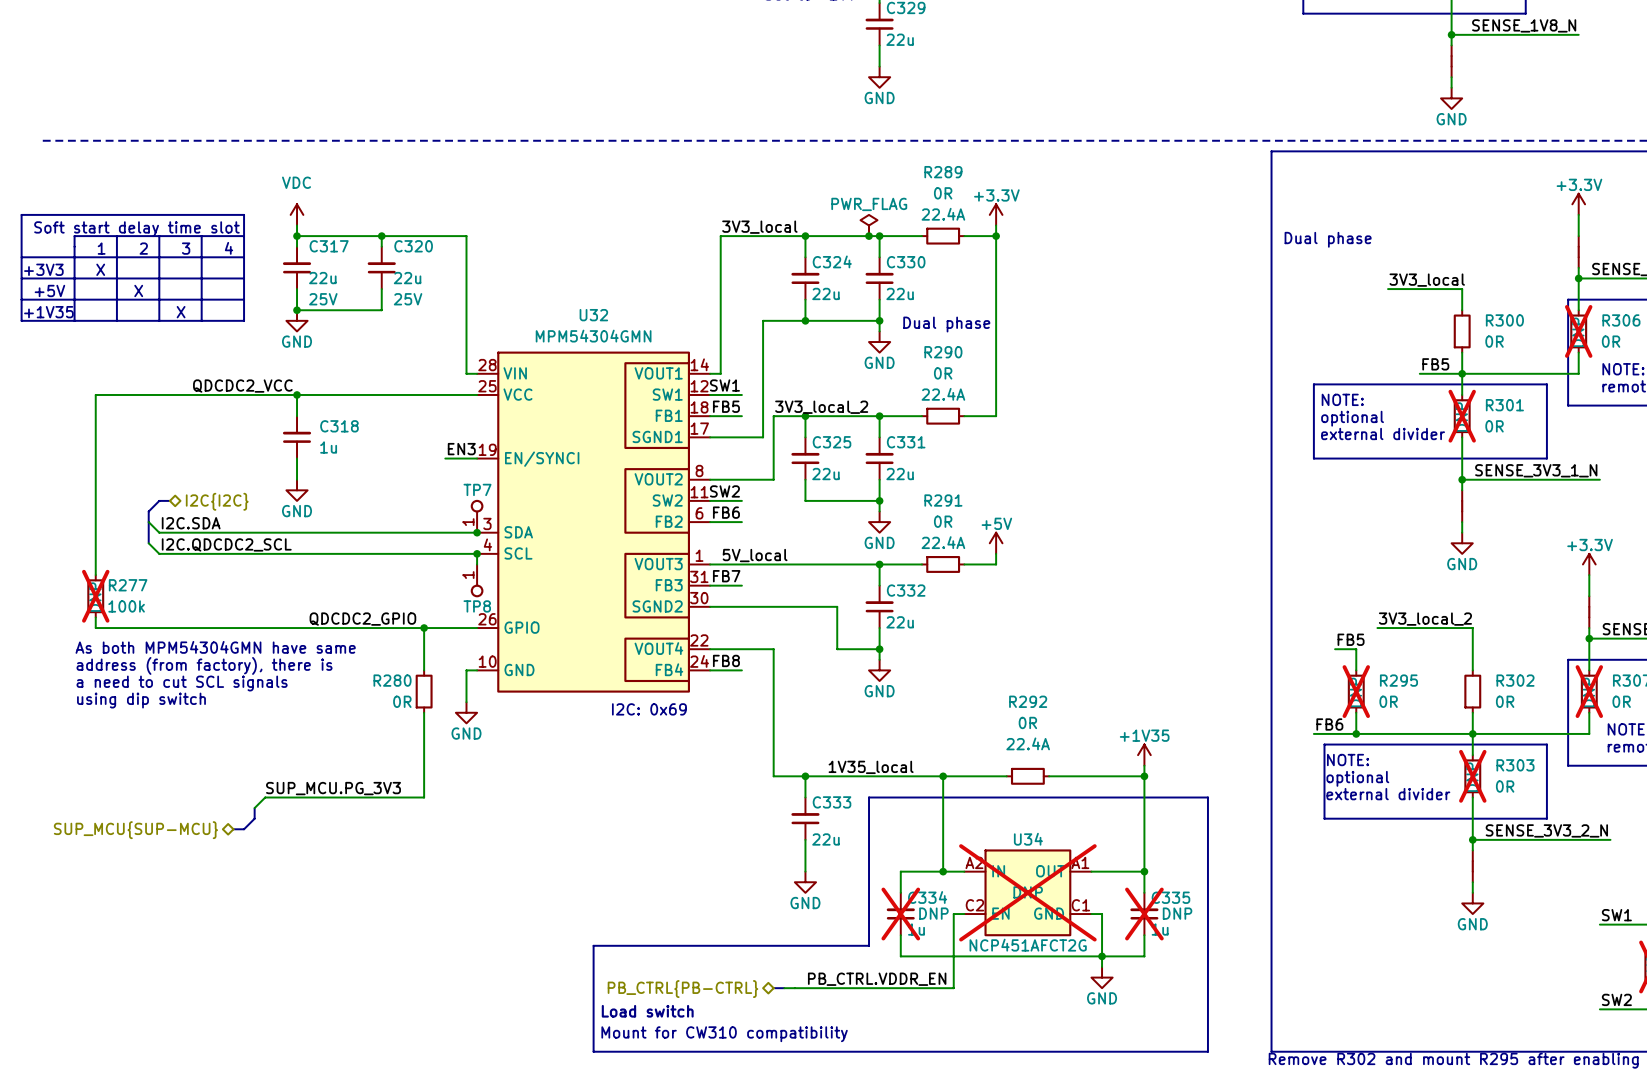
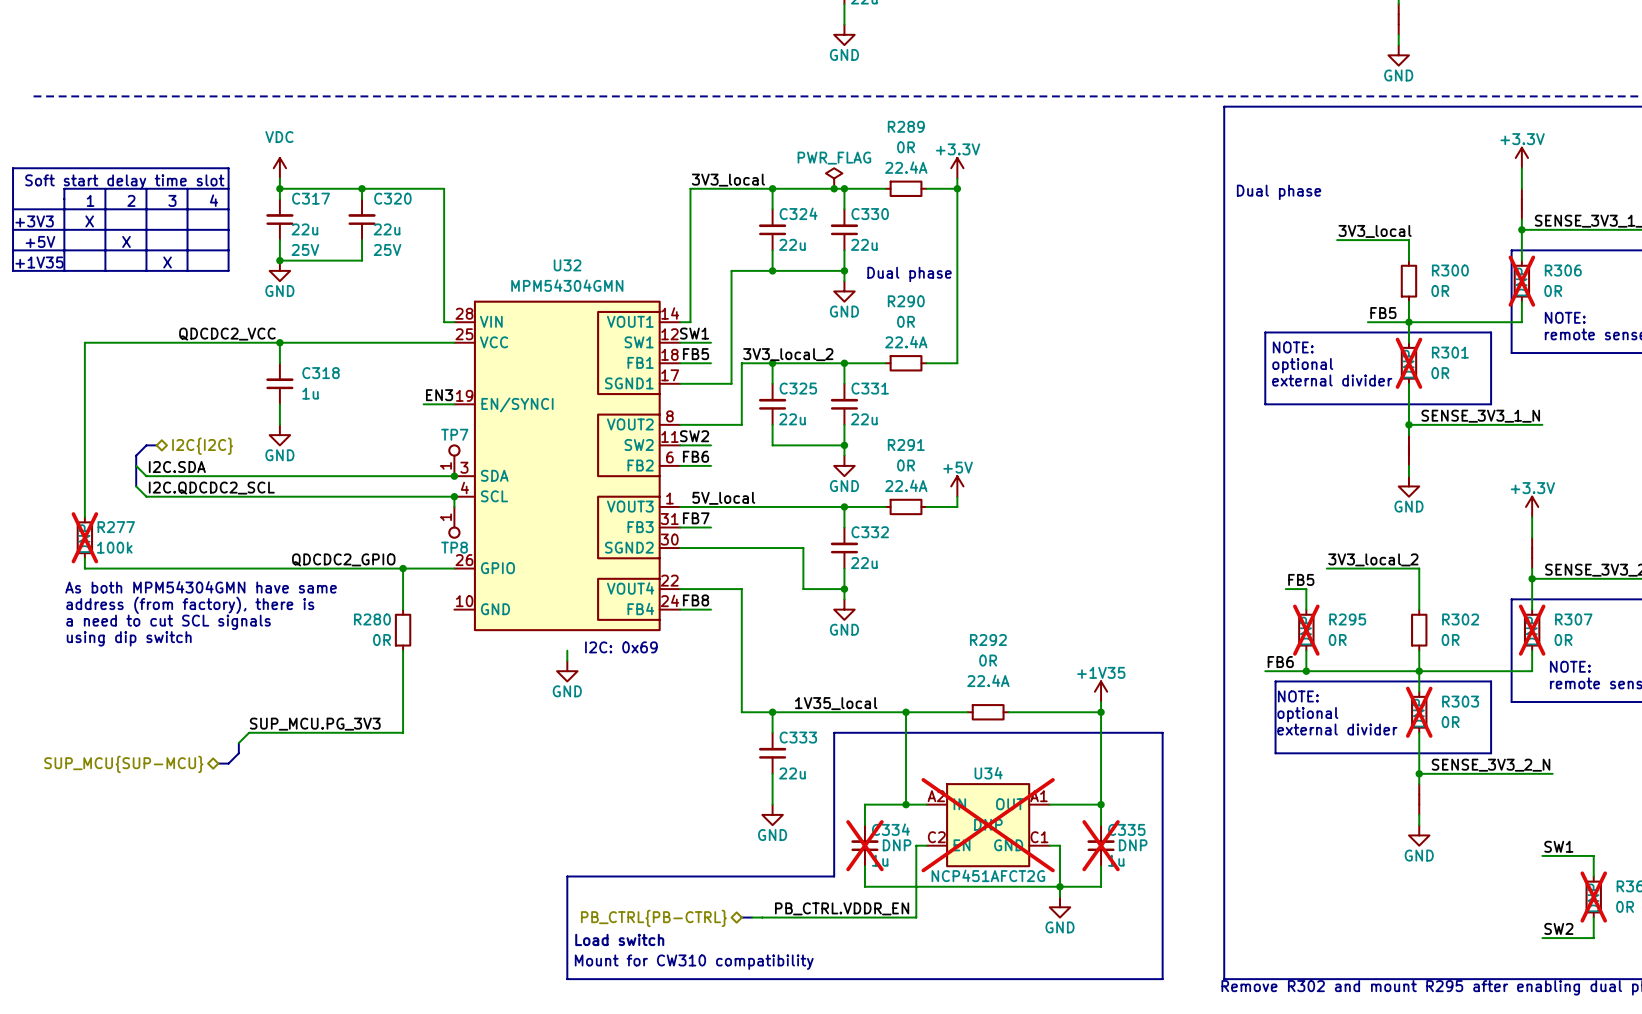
wire: (477, 670) (466, 670) (466, 702) -> none
power symbol position: GND (466, 712) -> GND (567, 671)
wire: none -> (567, 650) (567, 660)

